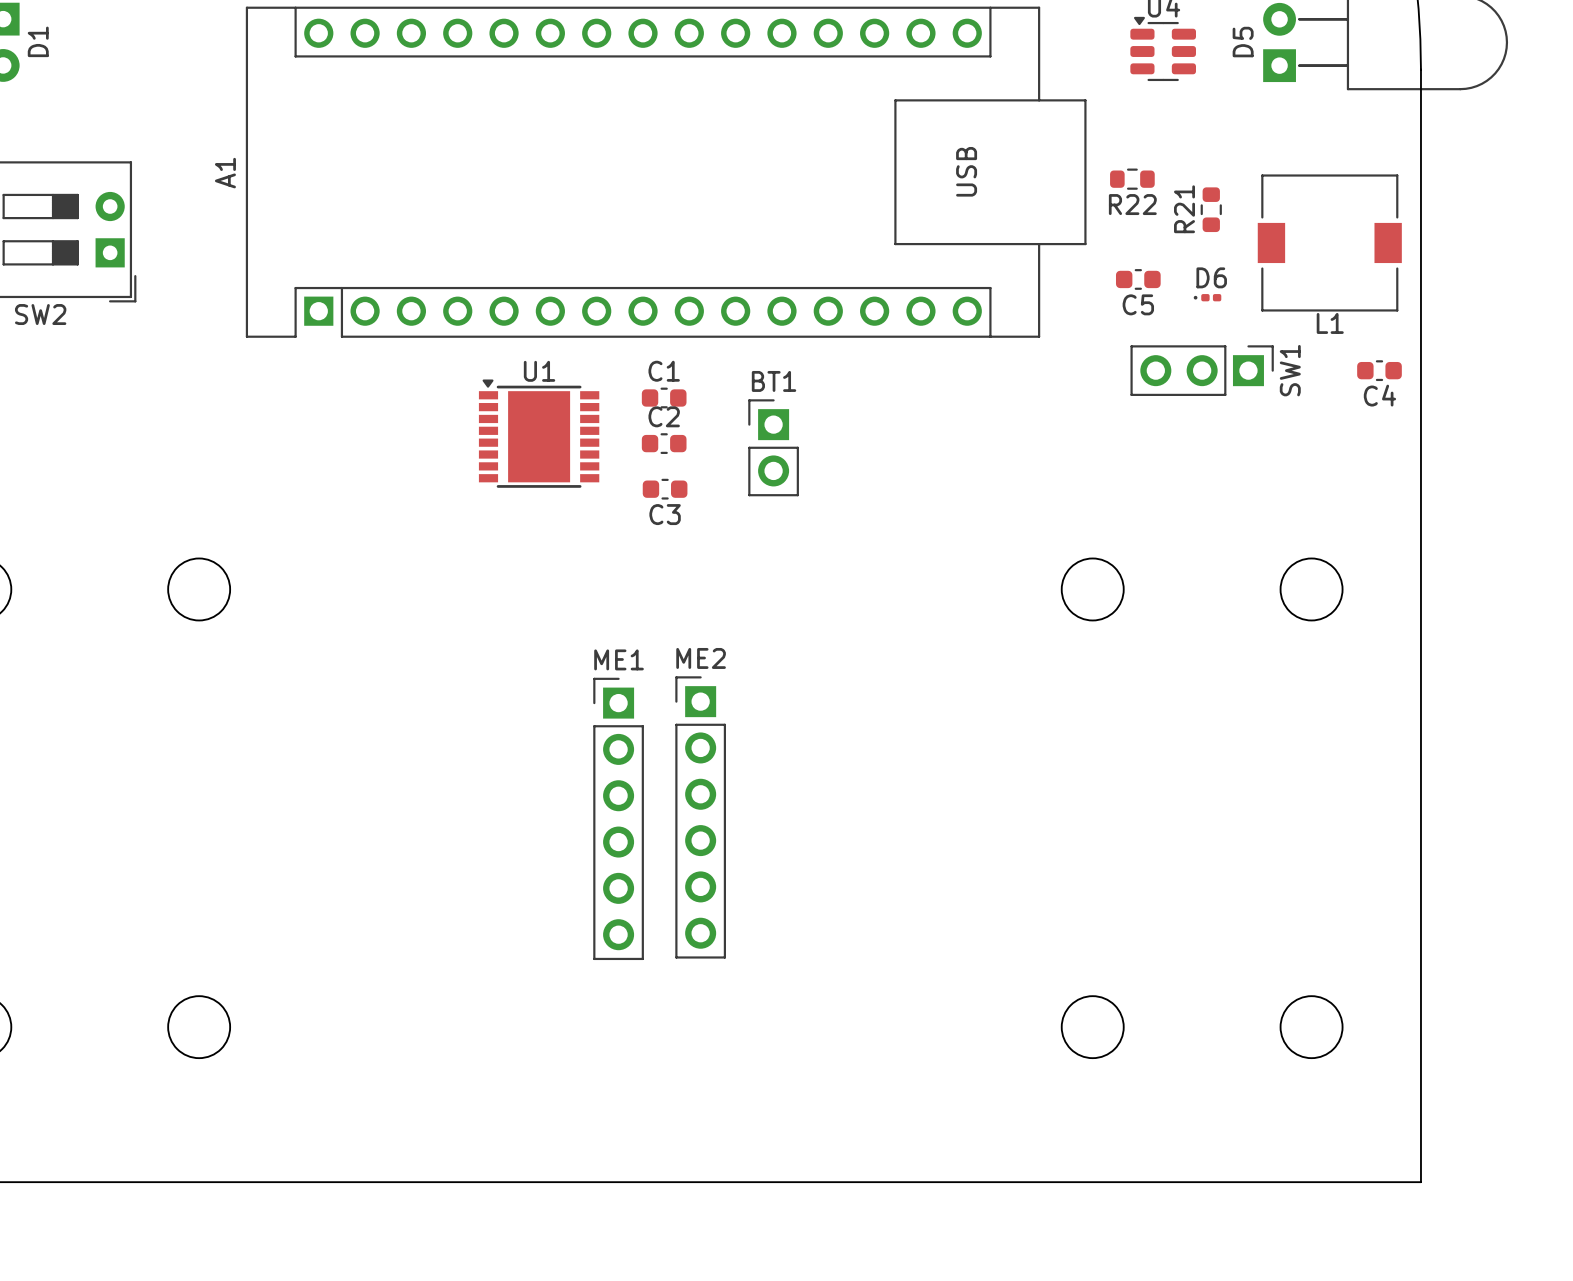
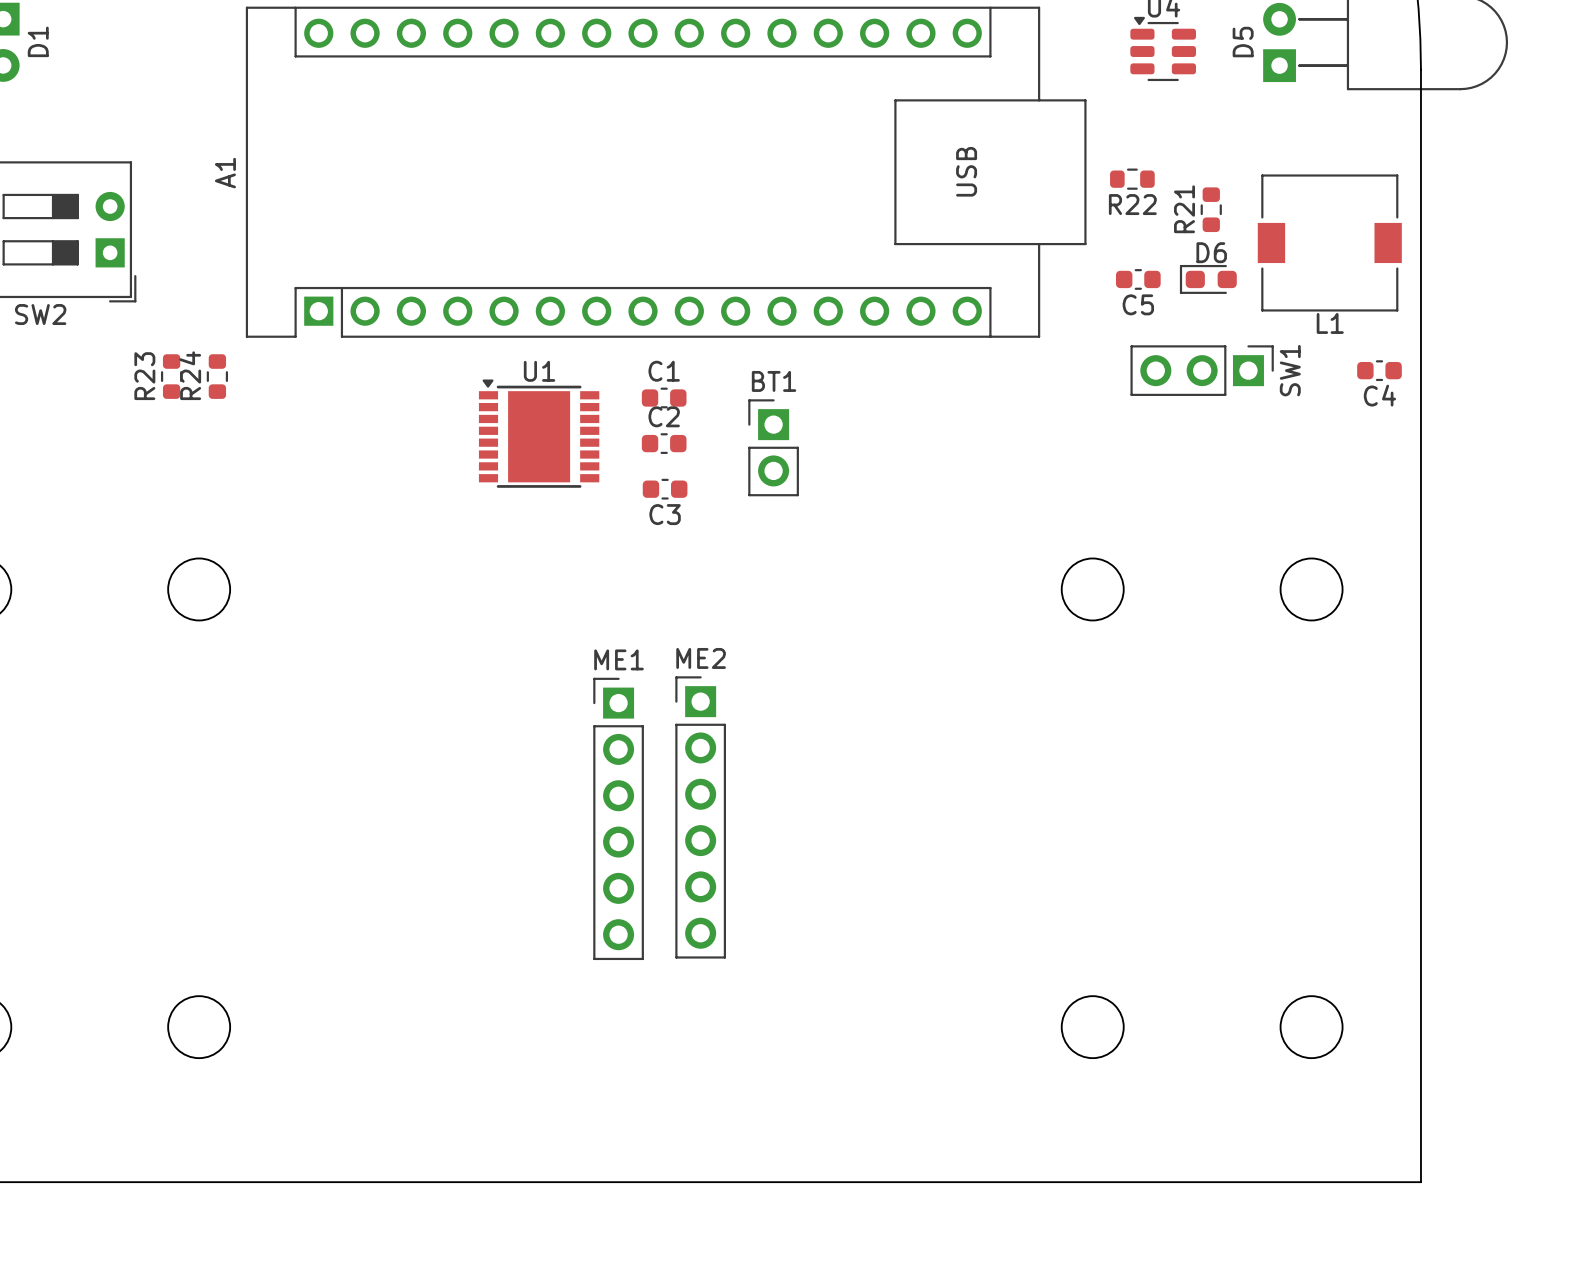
D6 footprint: [1193, 294, 1222, 302] -> [1179, 264, 1237, 294]
R23: none -> (171, 376)
R24: none -> (217, 376)

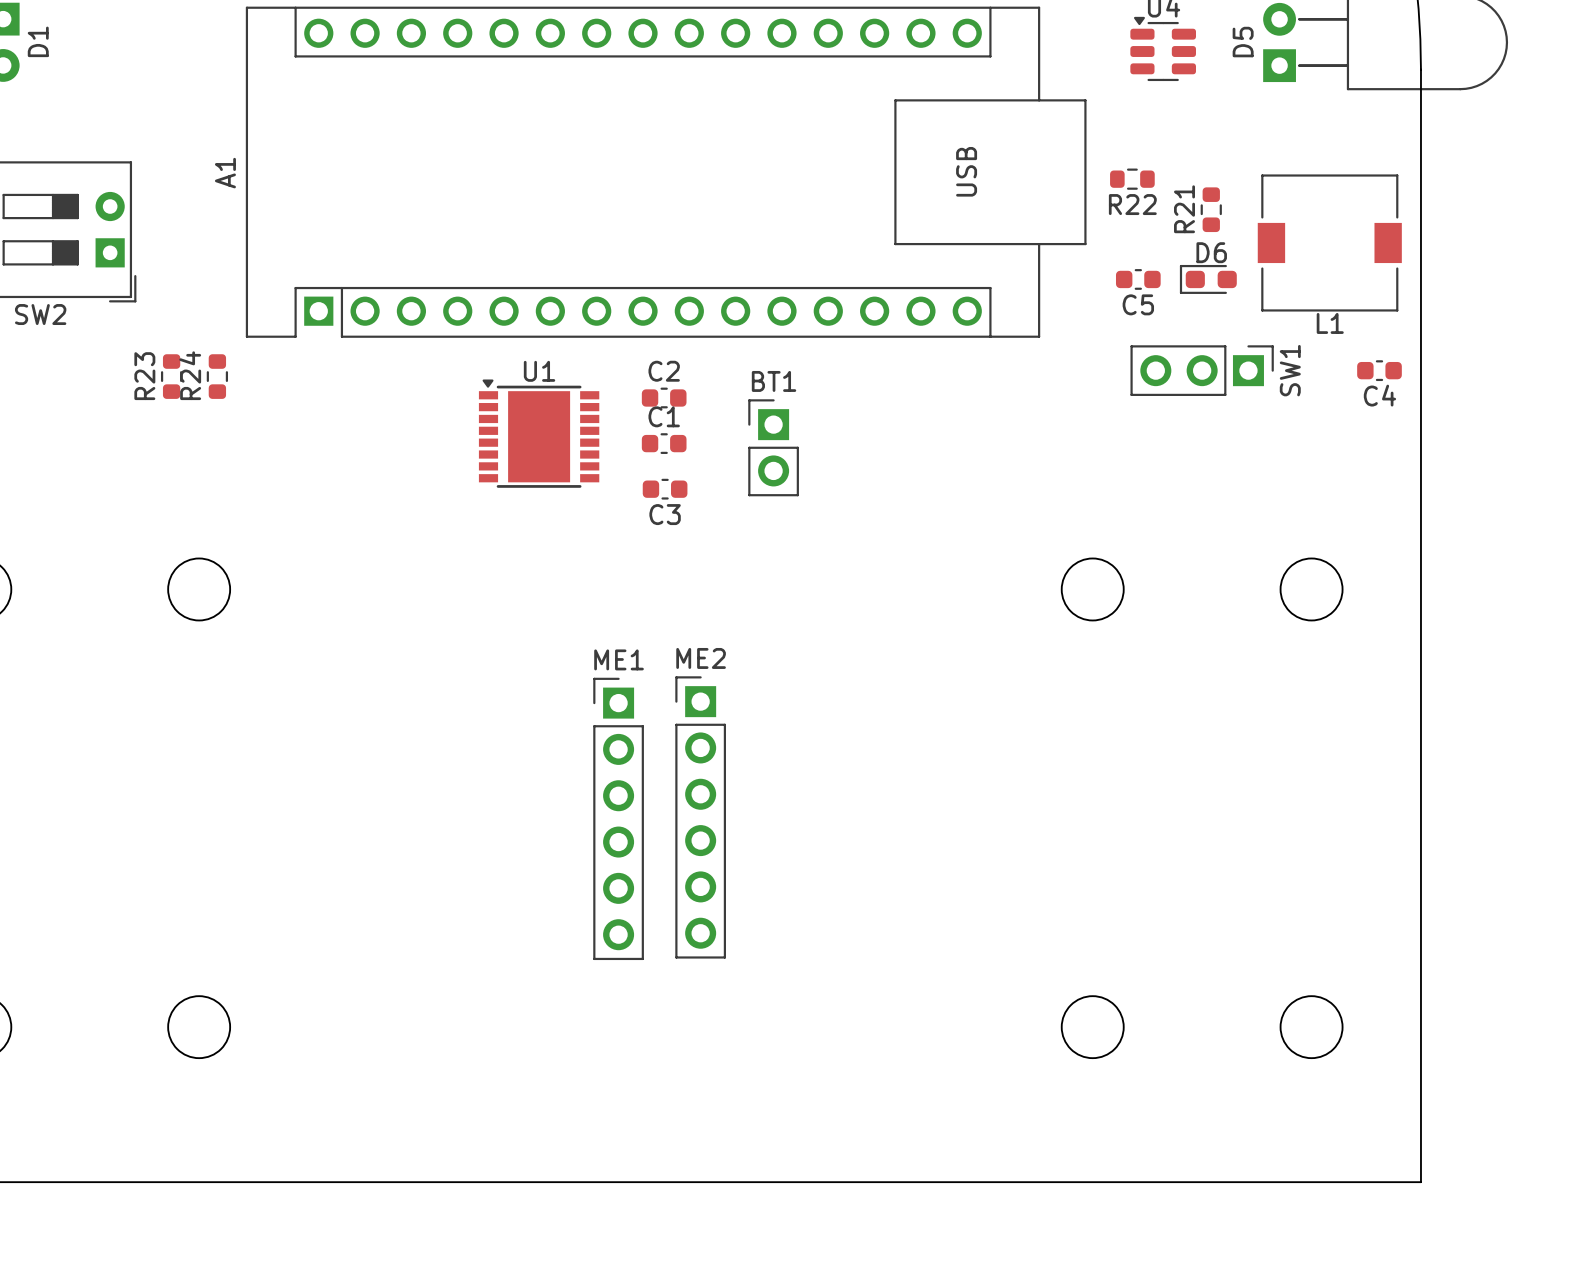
C1 name: C1 (664, 371) -> C2 (664, 371)
C2 name: C2 (664, 416) -> C1 (664, 416)

